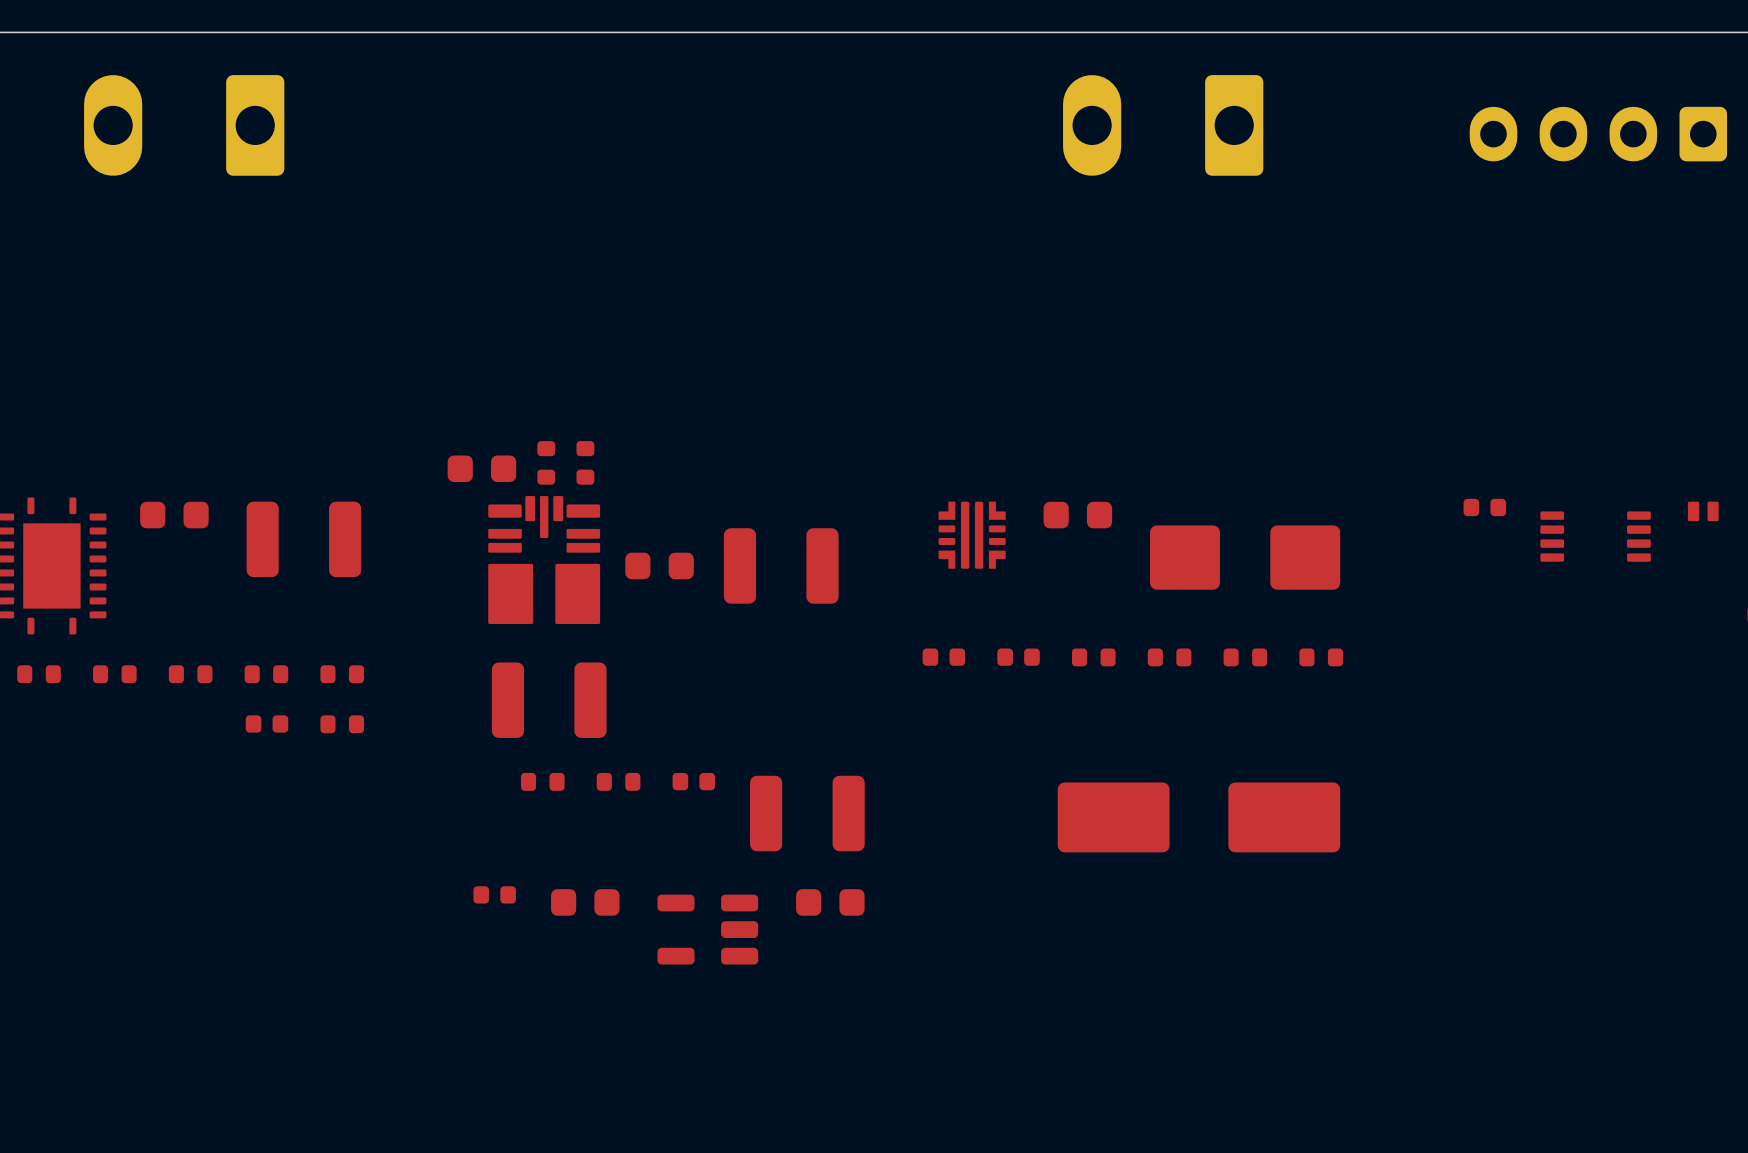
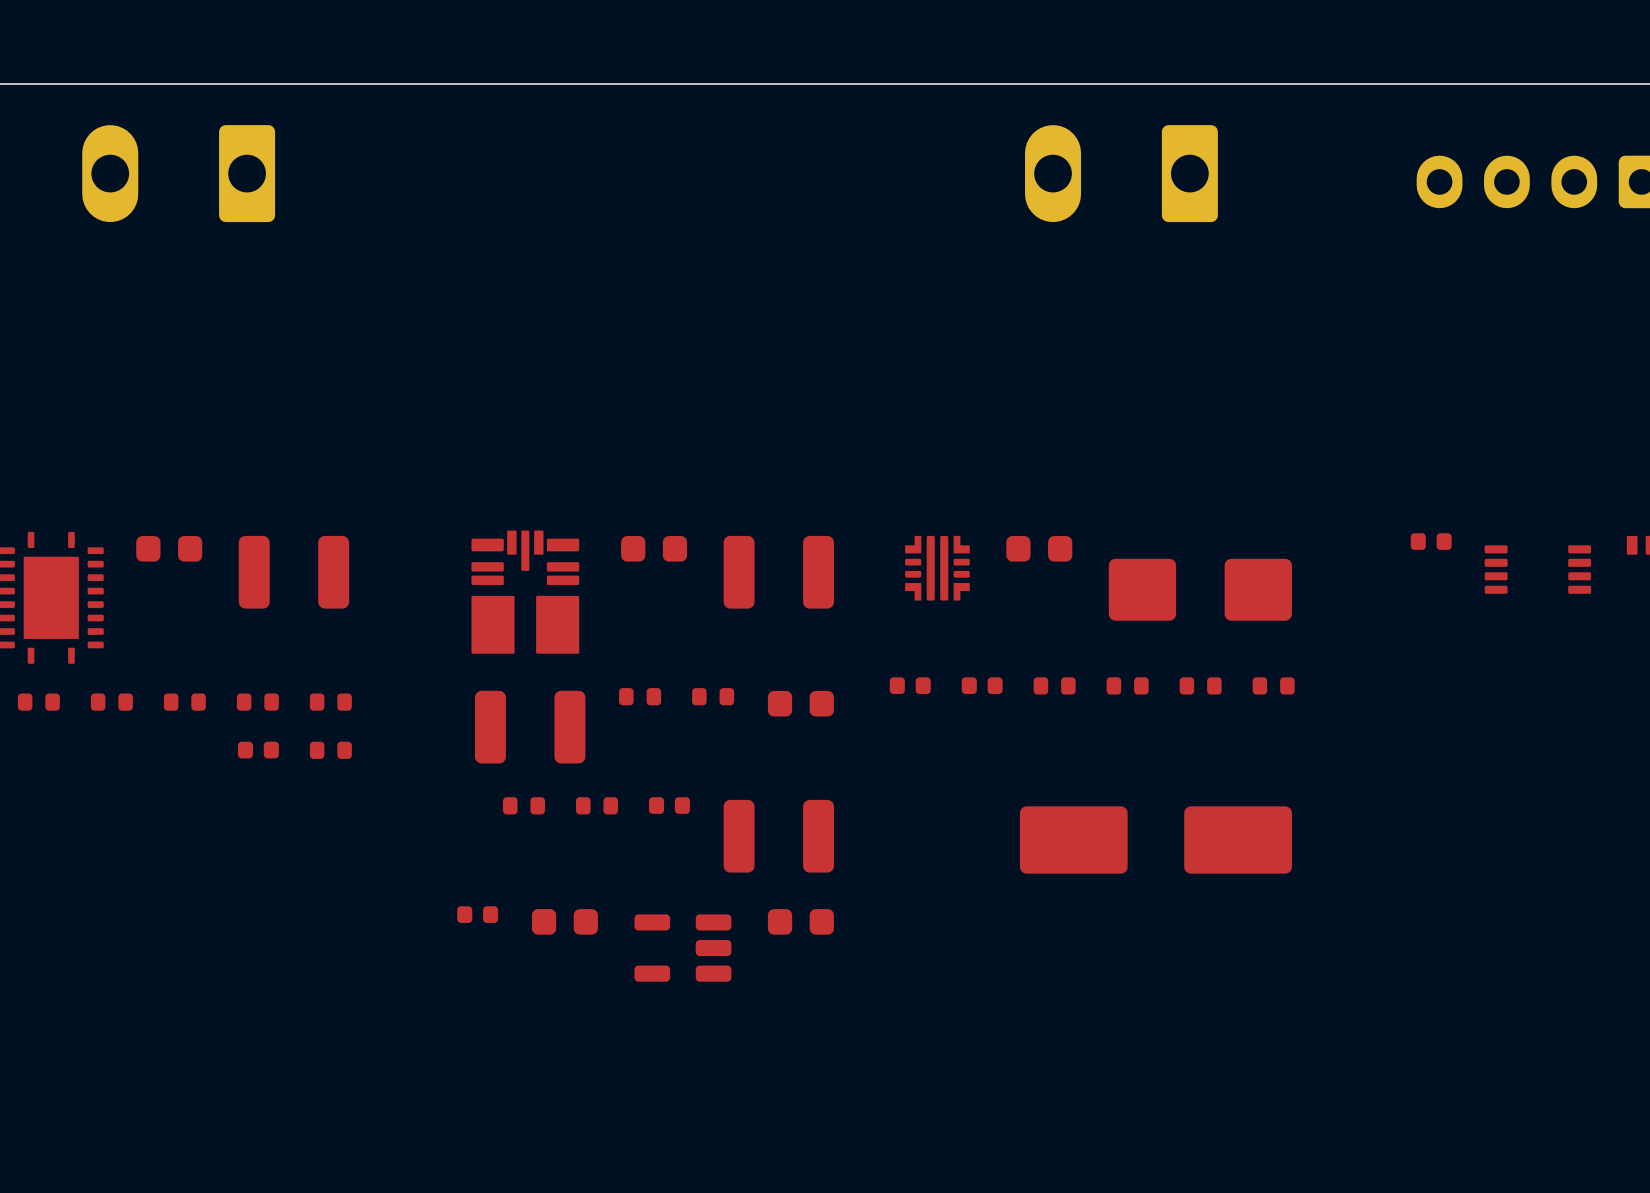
part: (546, 462) -> none
part: (585, 462) -> none
part: (481, 468) -> none
part position: (659, 565) -> (654, 548)
part position: (781, 565) -> (778, 572)
part: none -> (640, 696)
part: none -> (713, 696)
part: none -> (800, 703)

